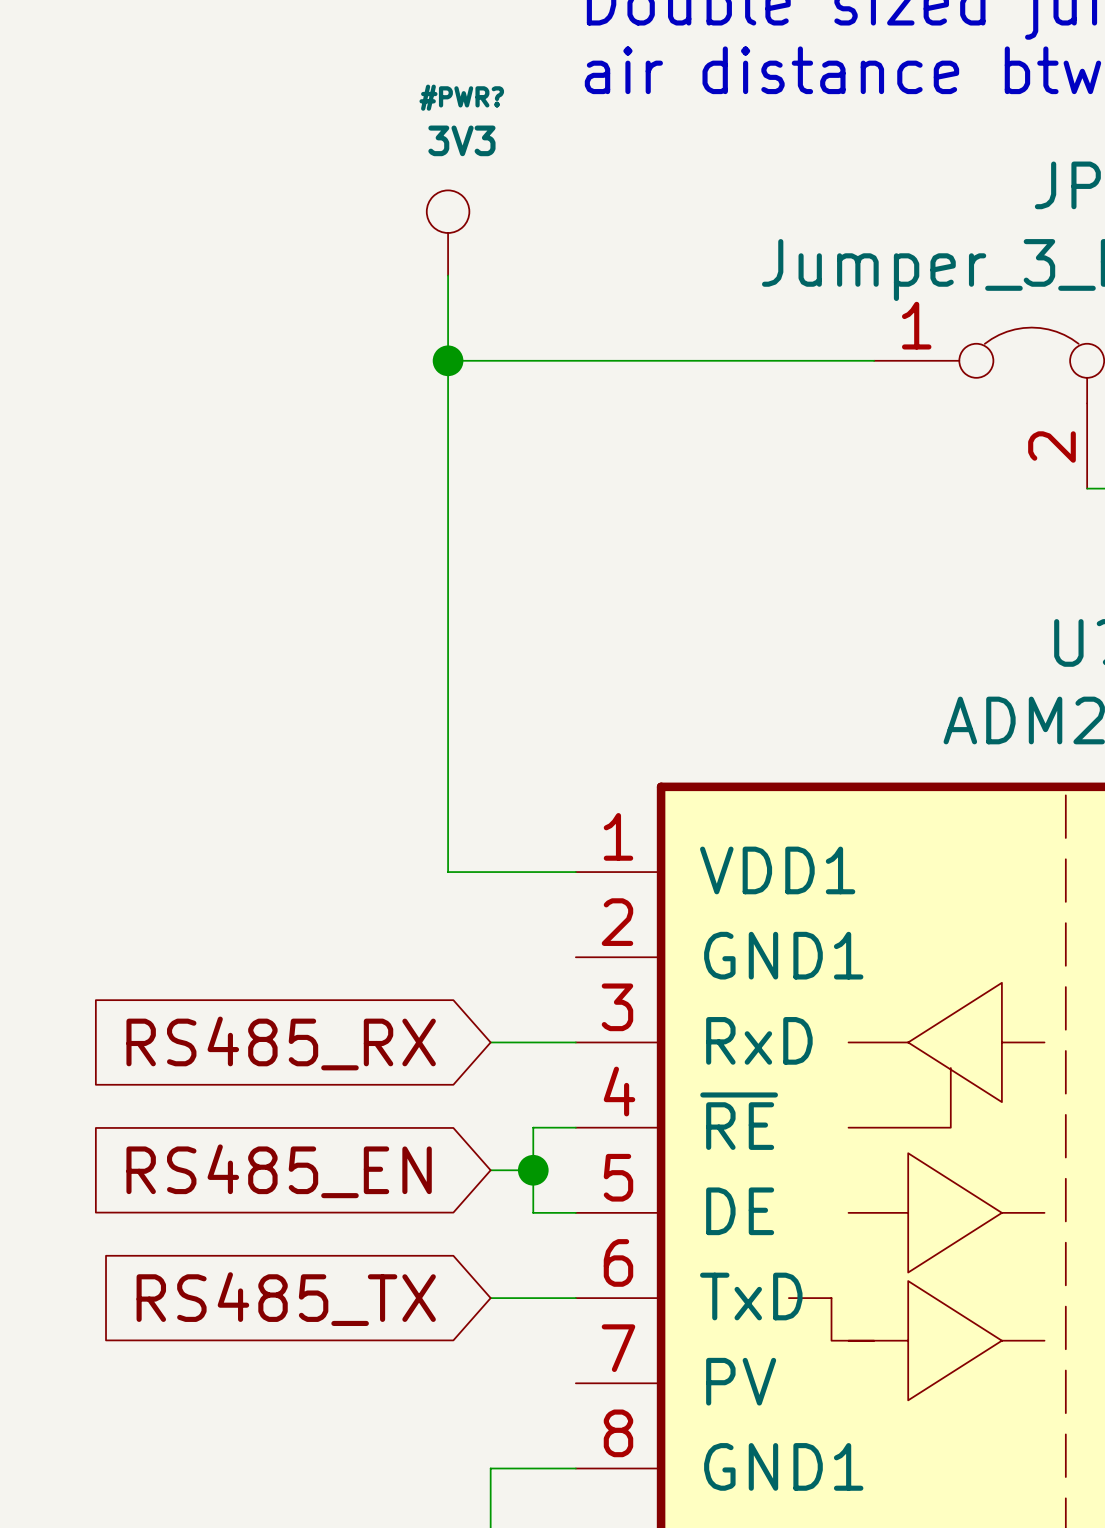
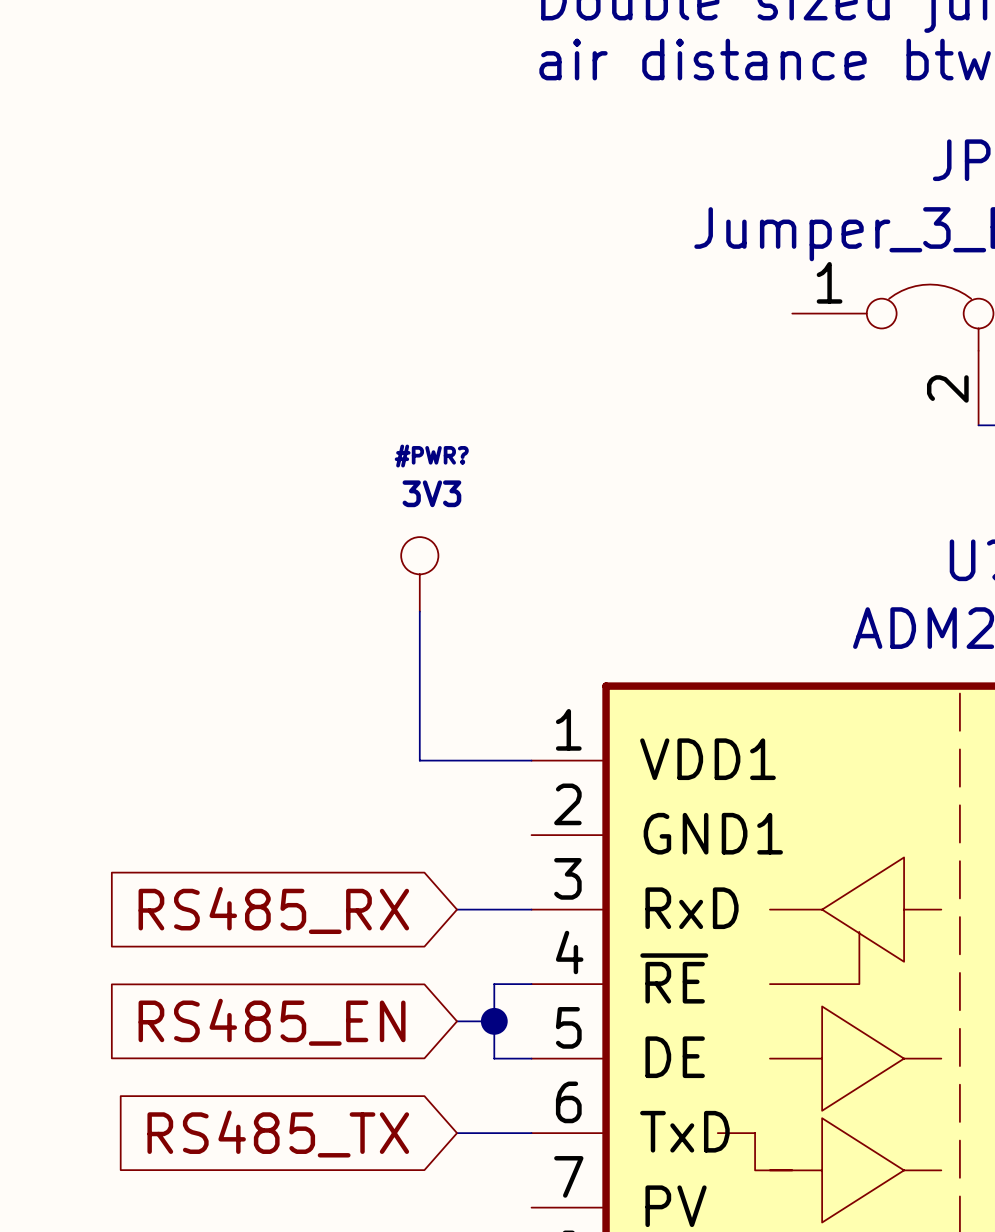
#PWR? position: 3V3 (448, 232) -> 3V3 (419, 574)
wire: (448, 275) (448, 701) -> none
wire: (448, 360) (874, 360) -> none
junction: (448, 360) -> none

